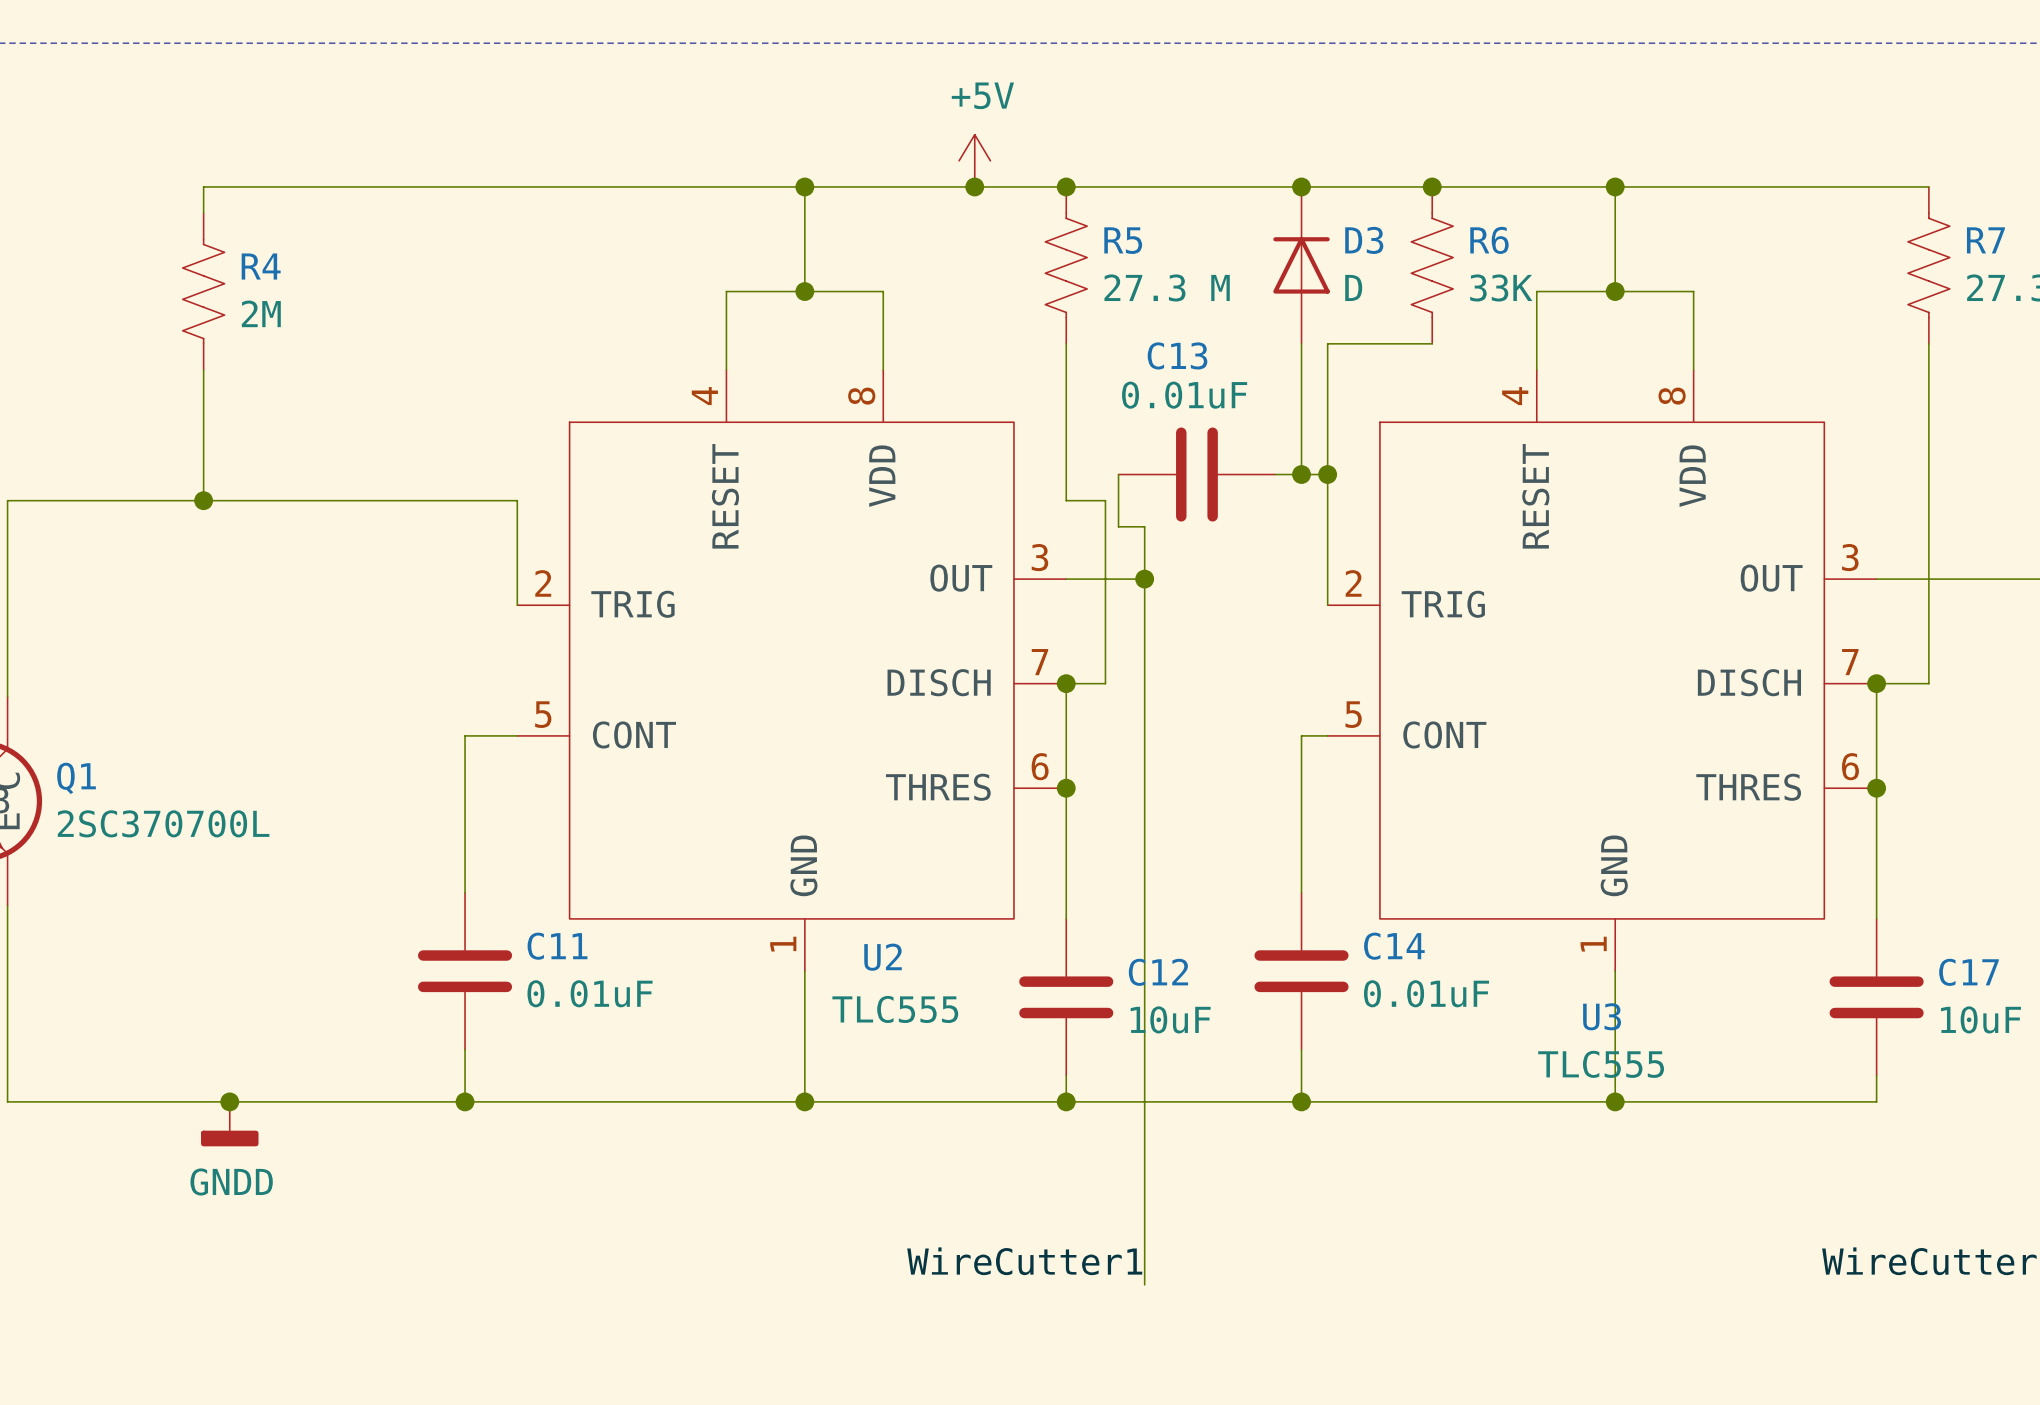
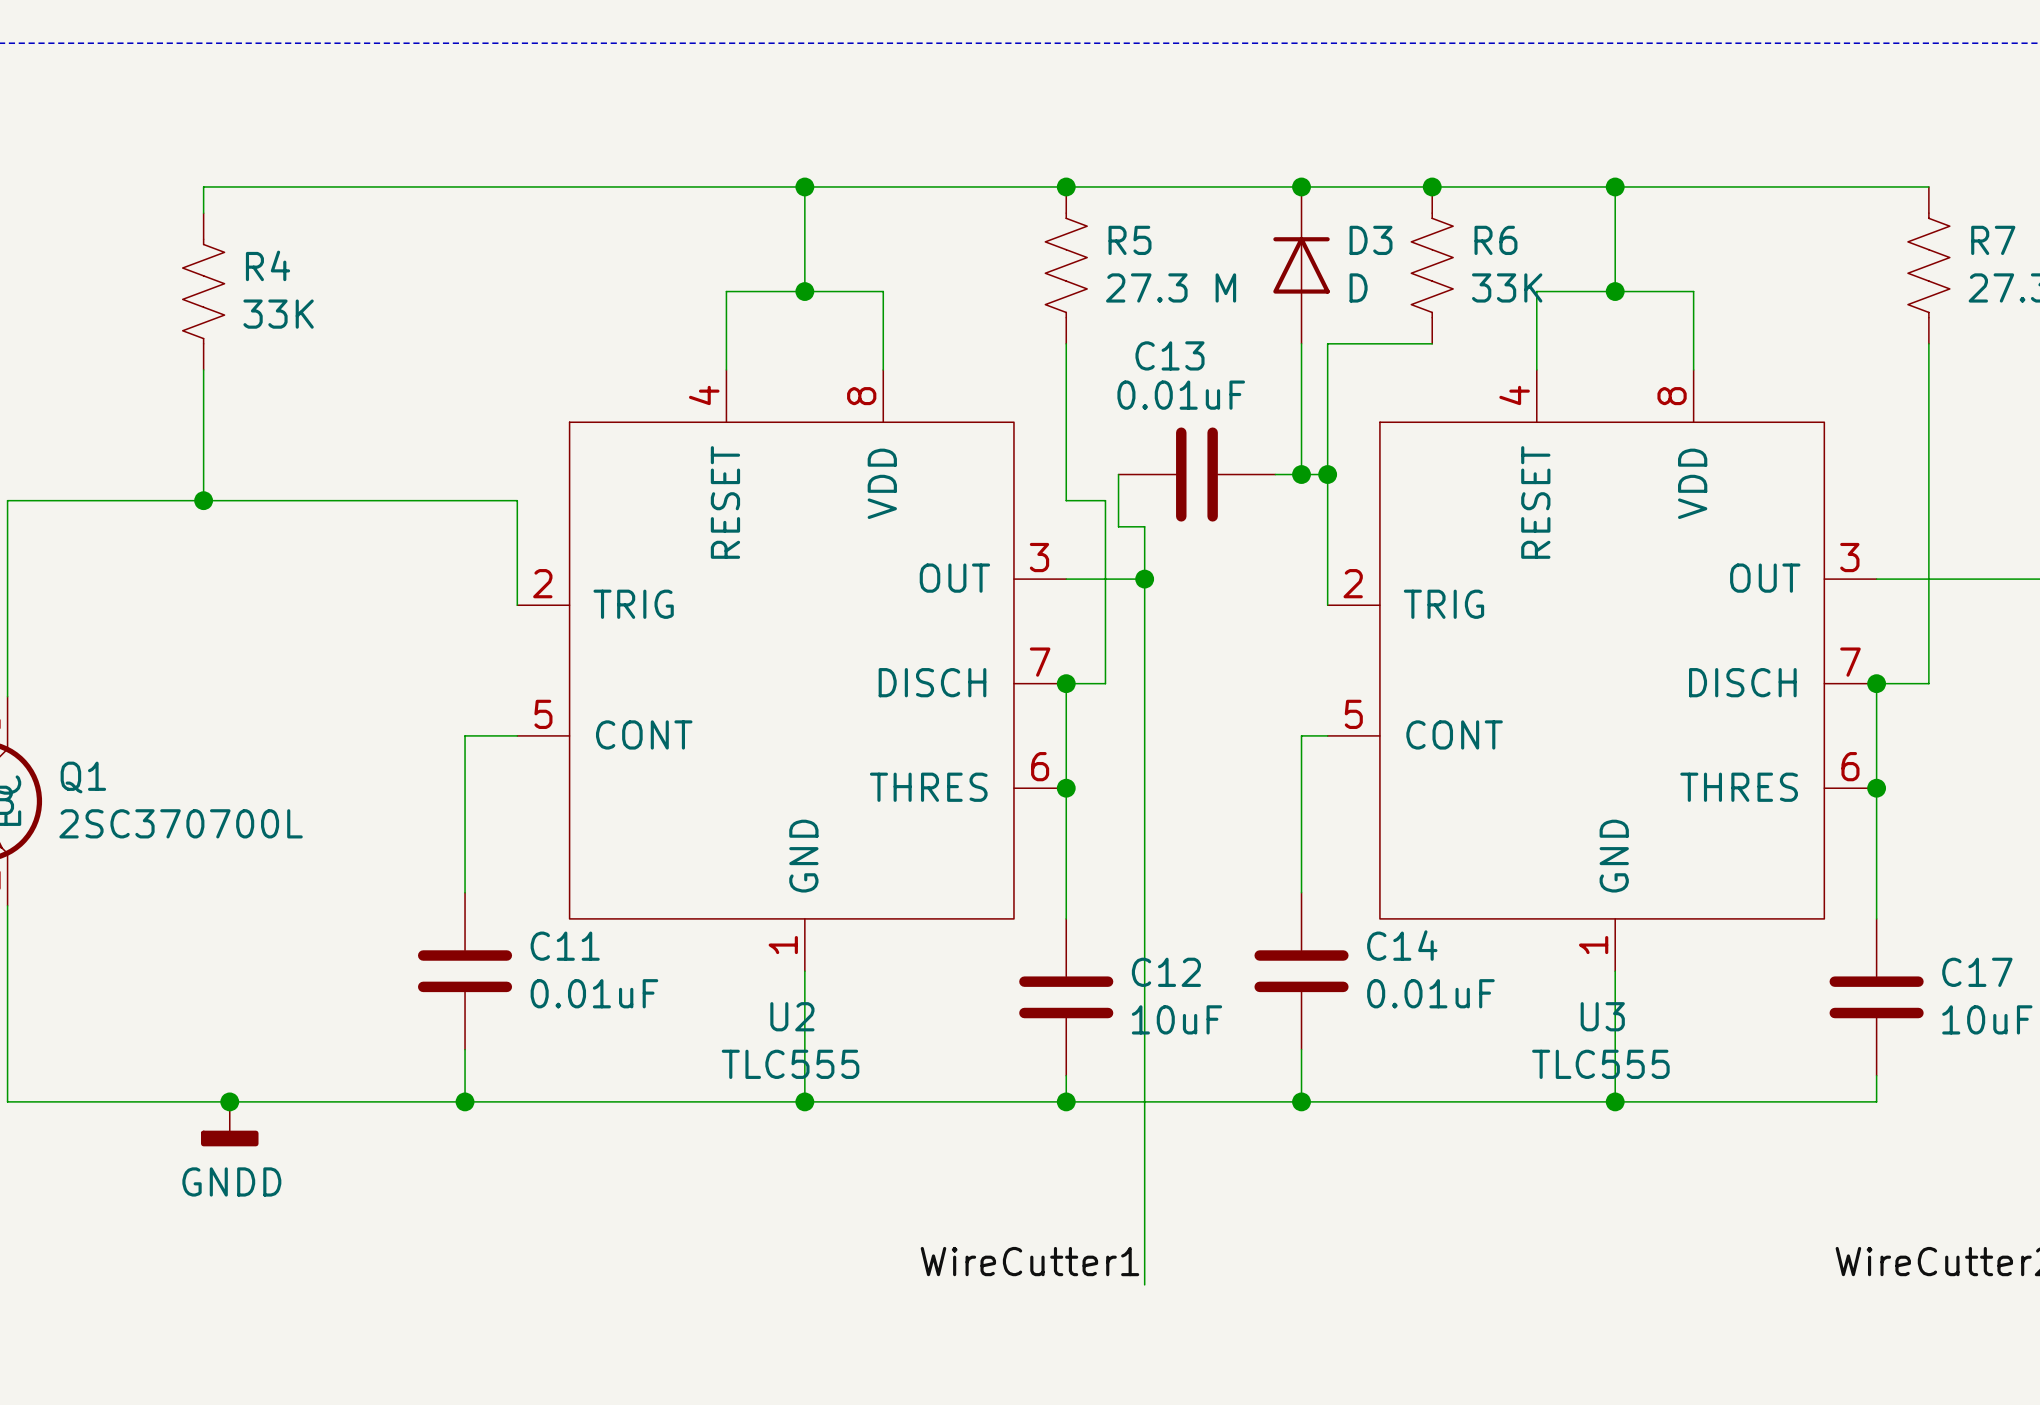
power symbol: +5V (974, 160) -> none
junction: (974, 186) -> none
R4 value: 2M (261, 313) -> 33K (278, 314)
U2 name position: U2 (883, 957) -> U2 (792, 1016)
U2 value position: TLC555 (895, 1009) -> TLC555 (790, 1064)

